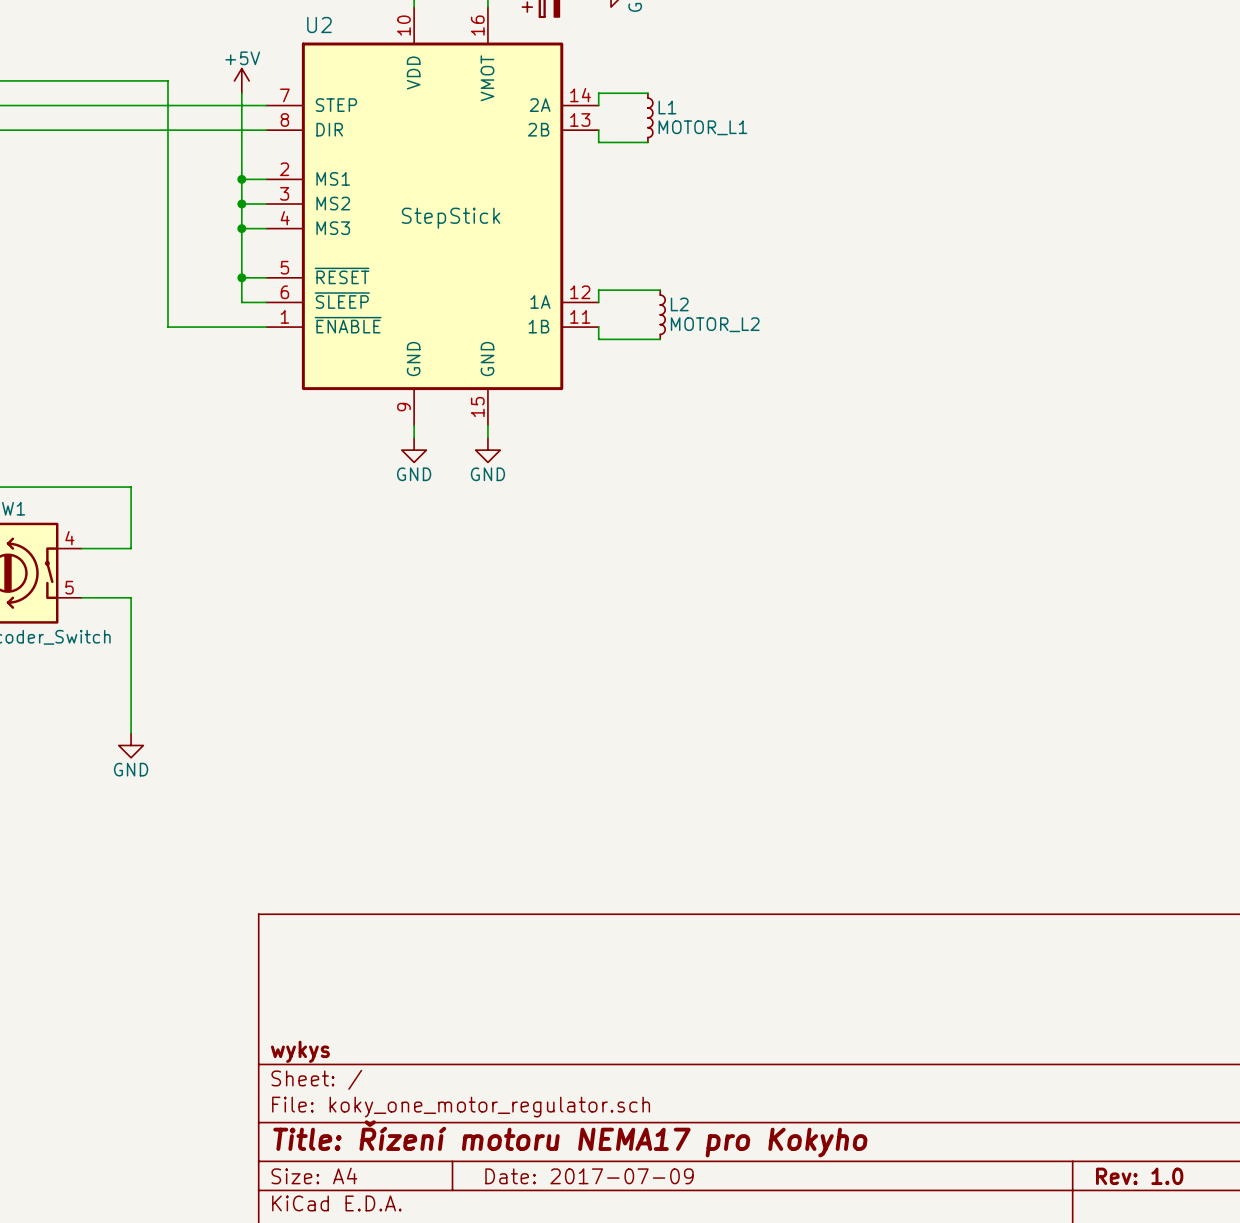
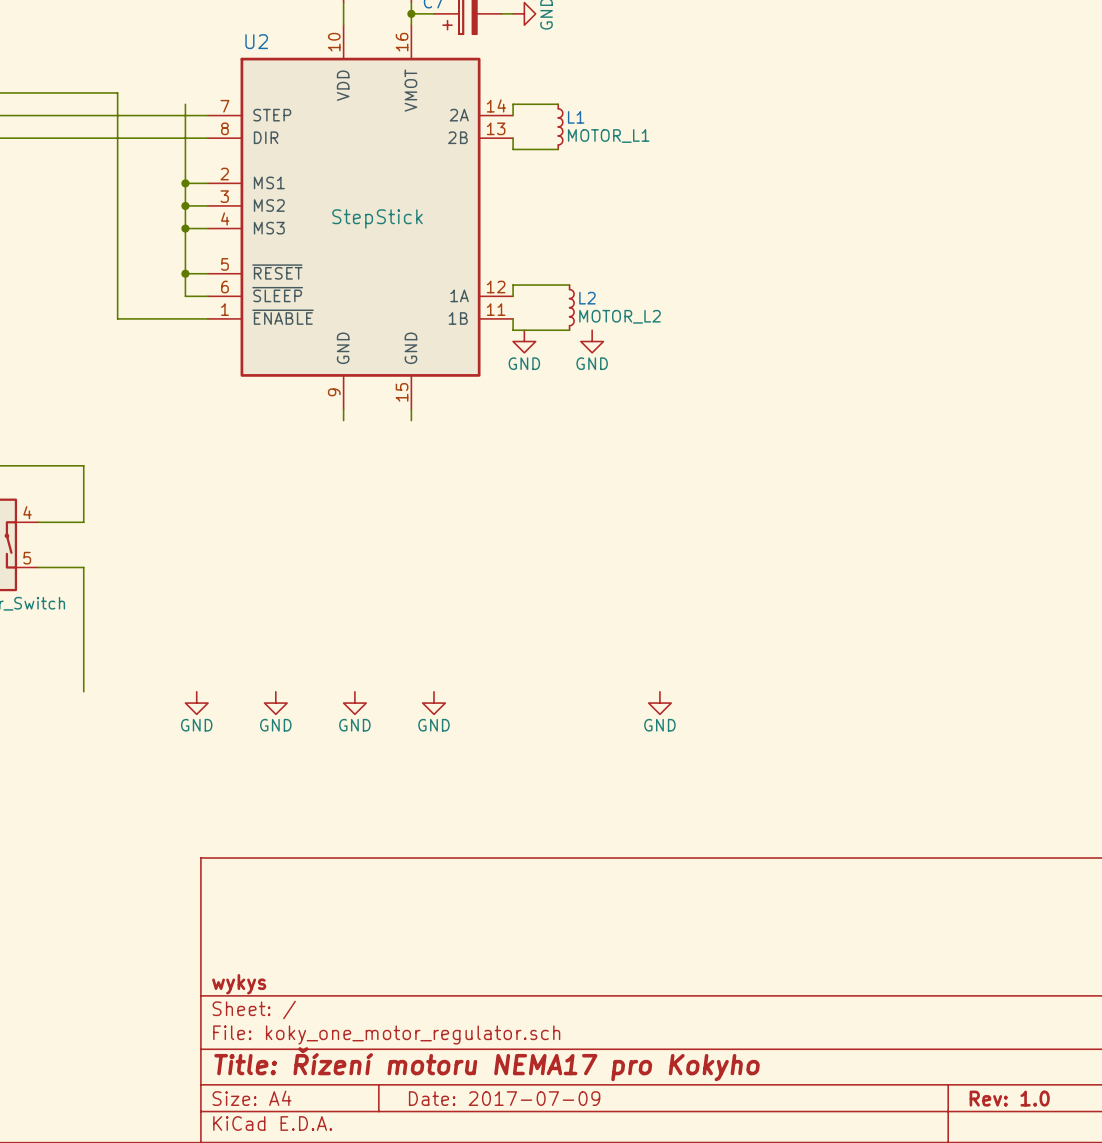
power symbol: +5V (241, 80) -> none
power symbol: none -> GND (524, 341)
power symbol: none -> GND (592, 341)
power symbol: GND (414, 450) -> none
power symbol: GND (487, 450) -> none
power symbol: GND (131, 745) -> none
power symbol: none -> GND (196, 703)
power symbol: none -> GND (275, 703)
power symbol: none -> GND (354, 703)
power symbol: none -> GND (433, 703)
power symbol: none -> GND (659, 703)

